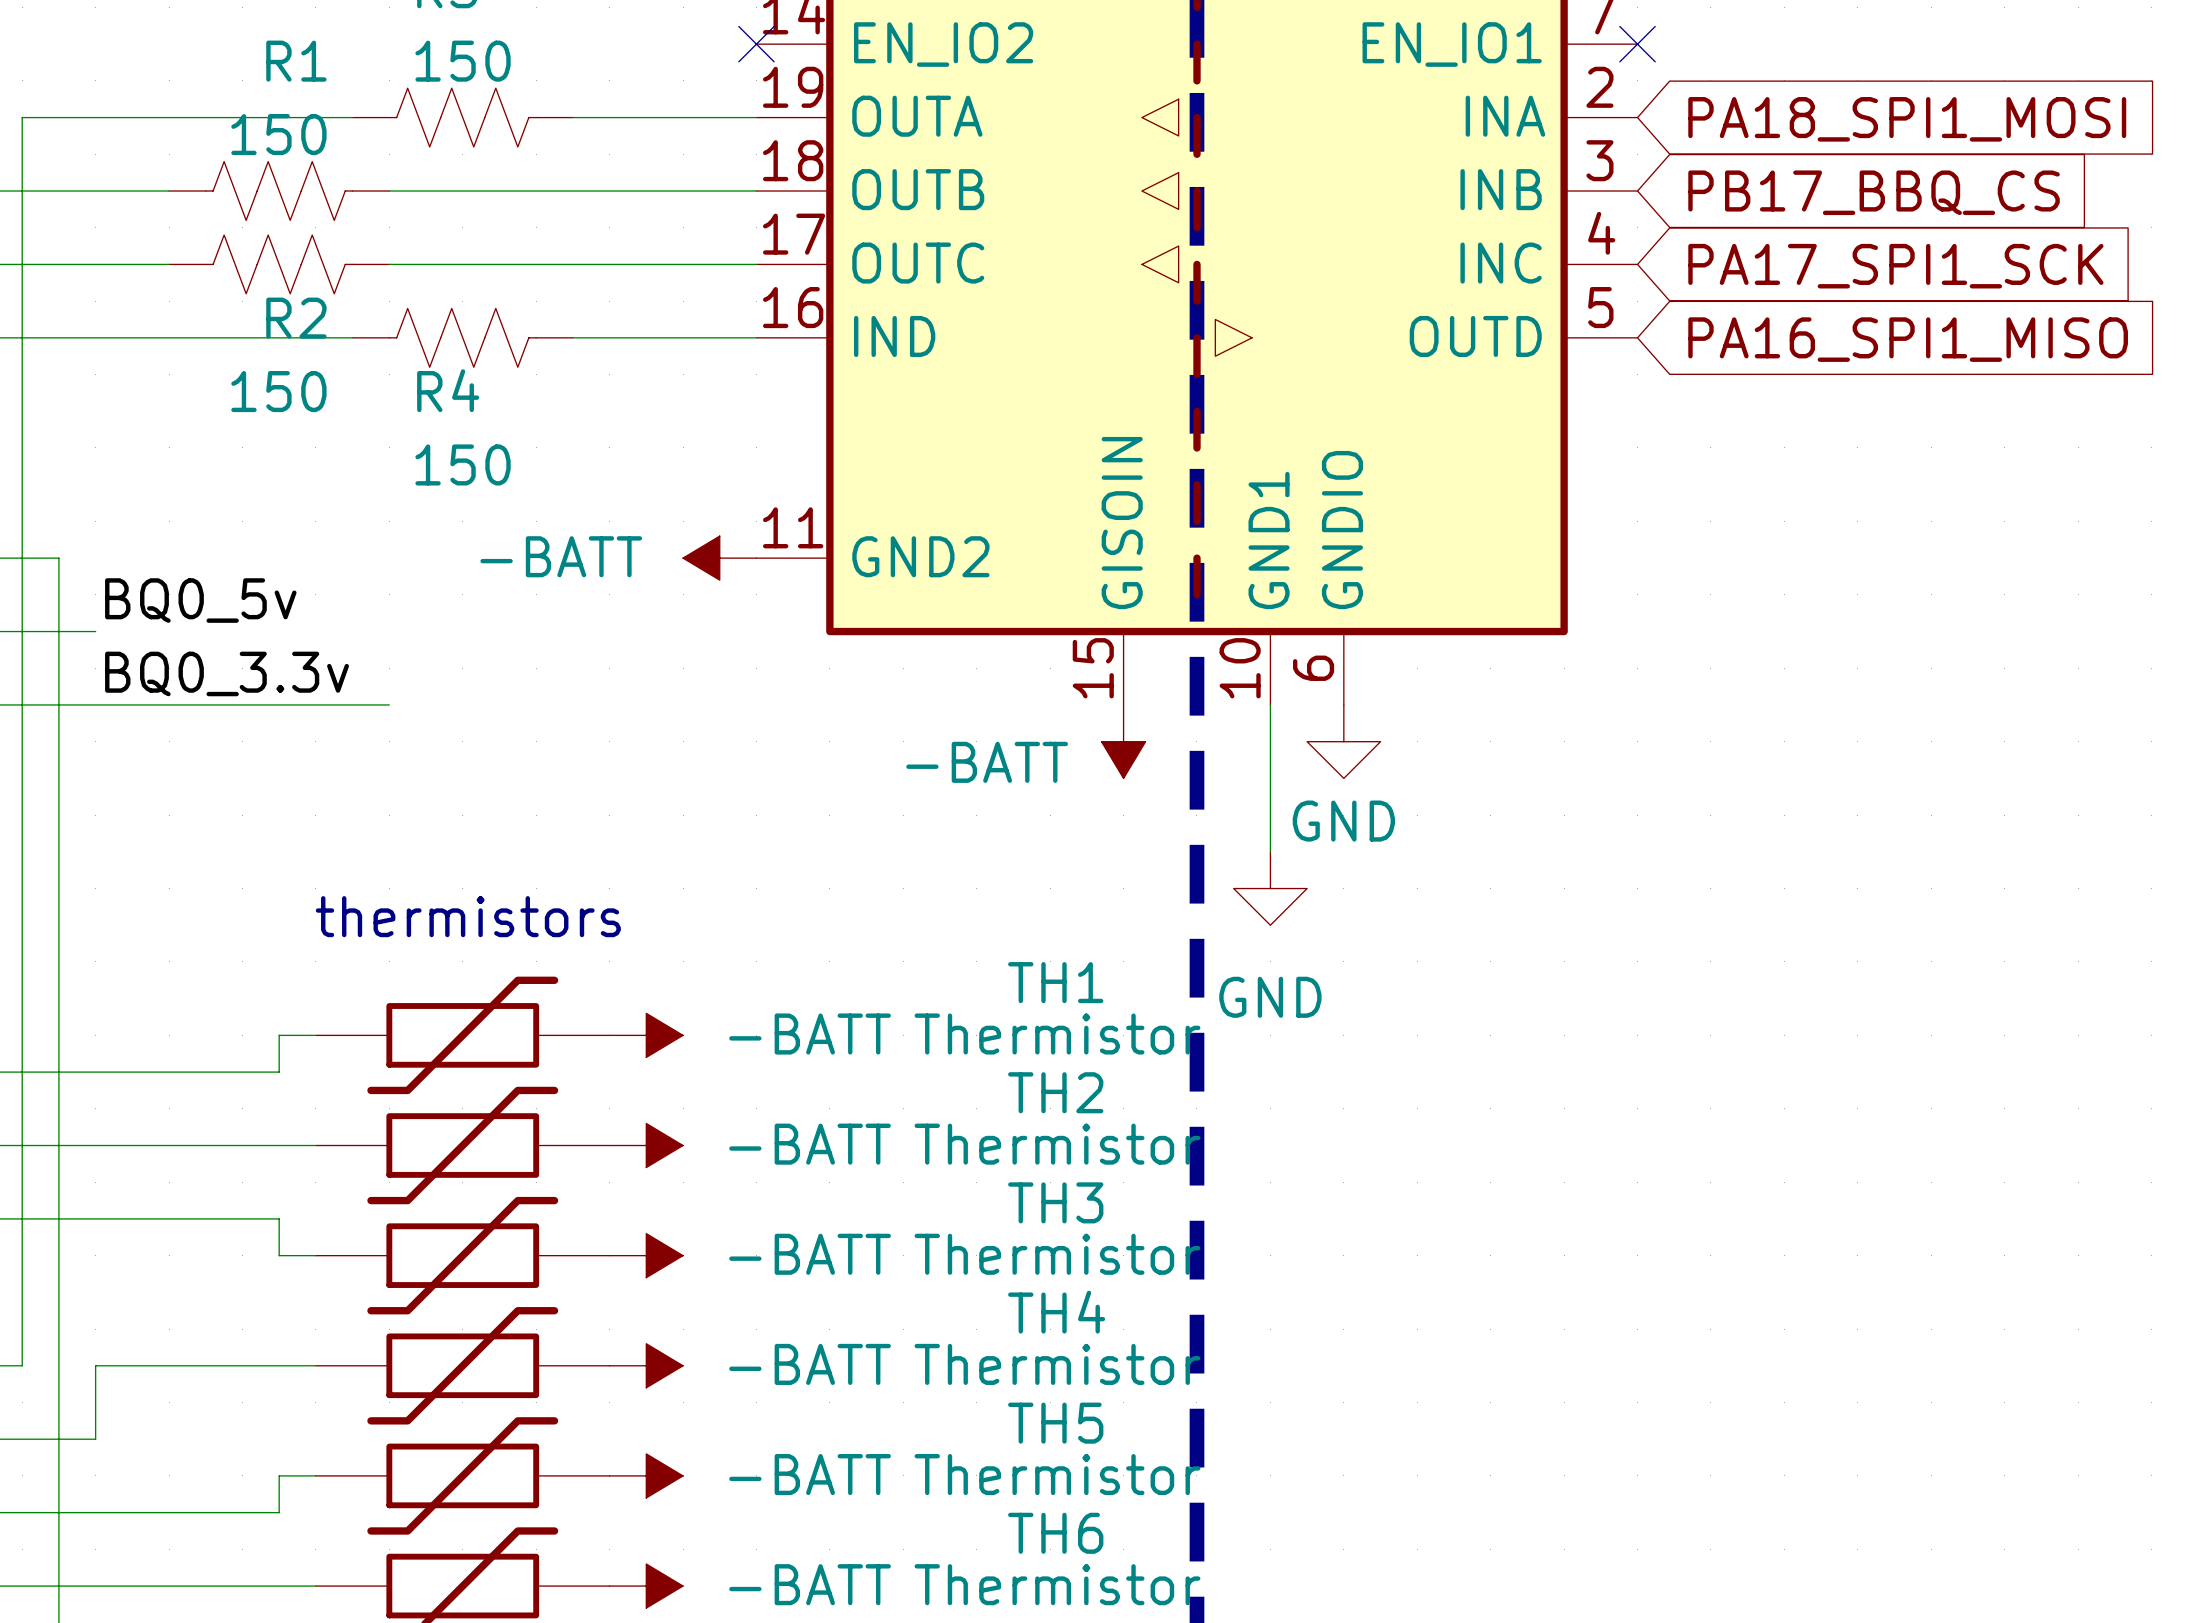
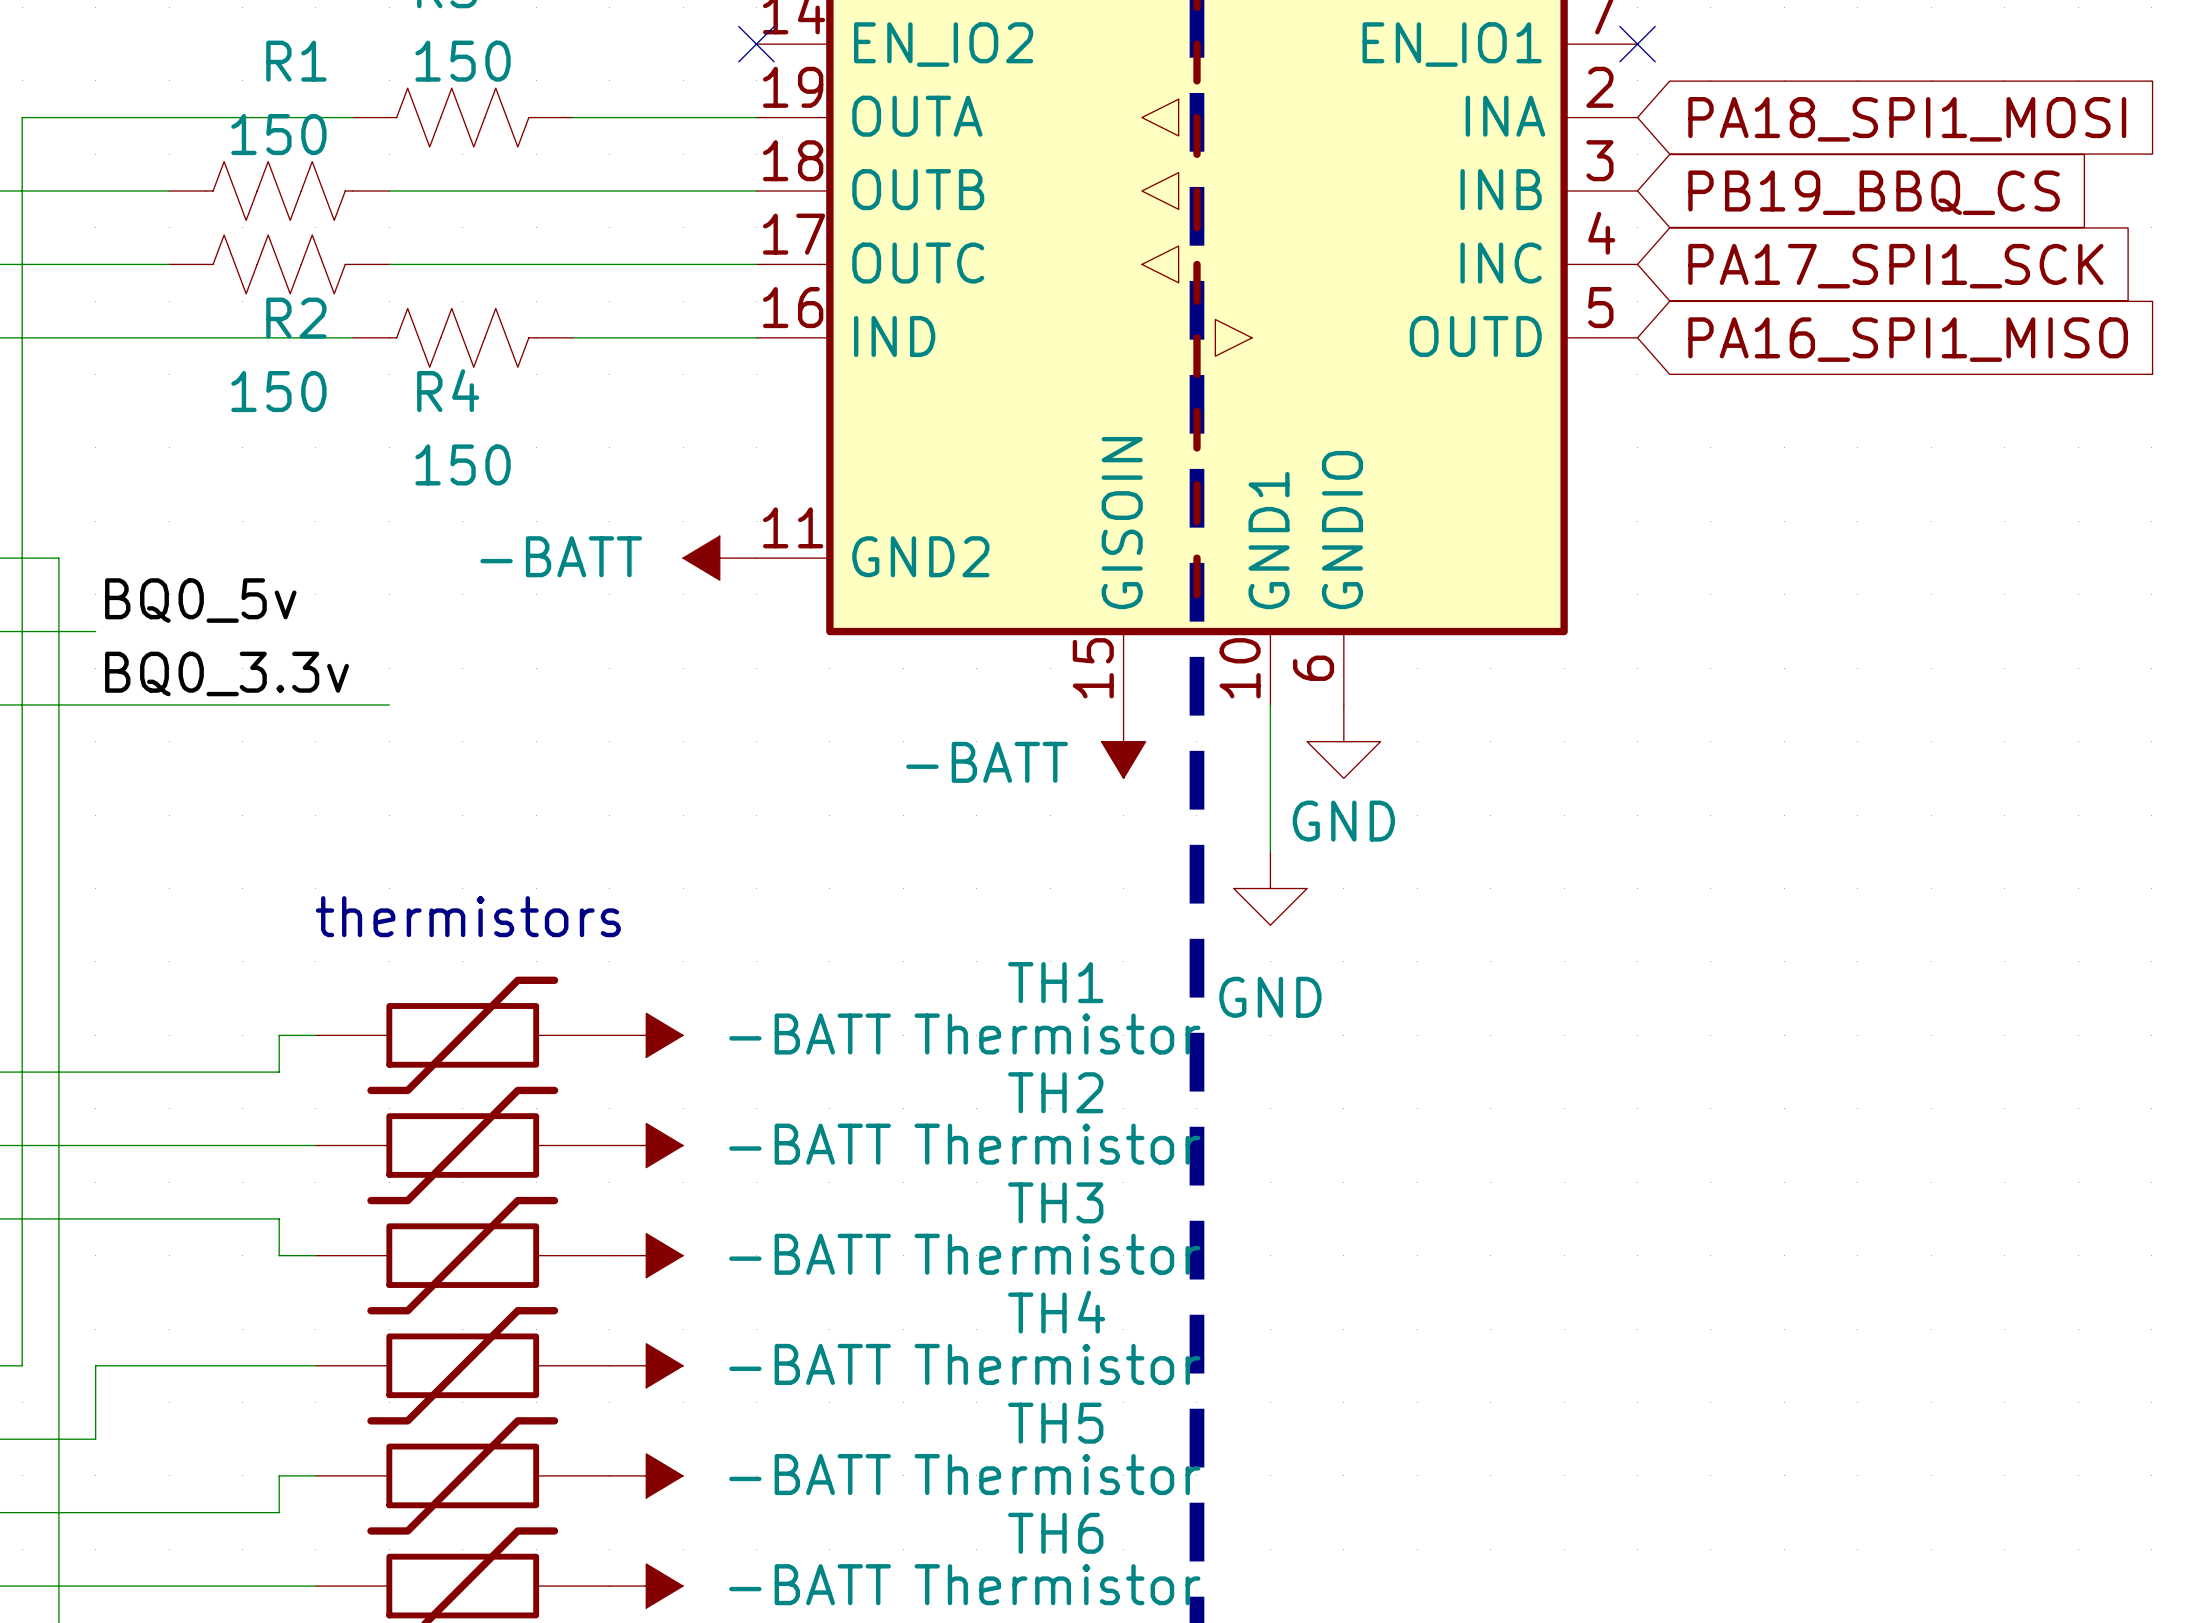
global label: PB17_BBQ_CS (1874, 192) -> PB19_BBQ_CS (1874, 192)

